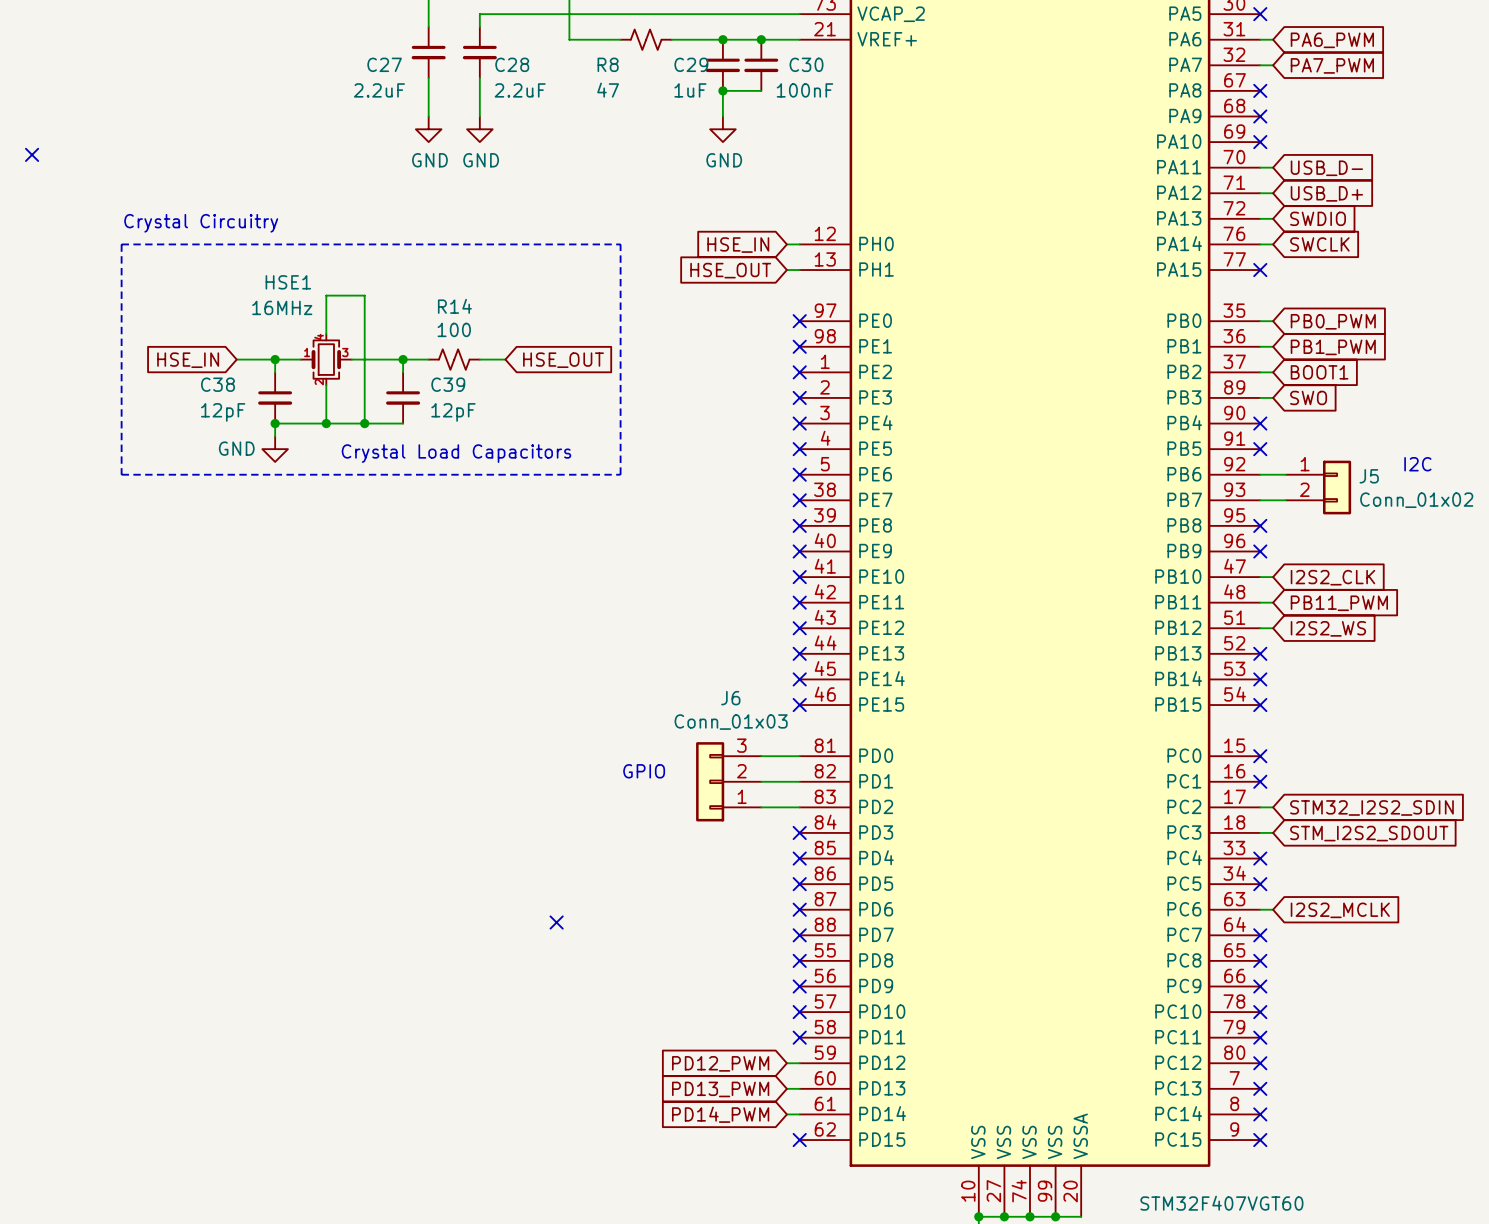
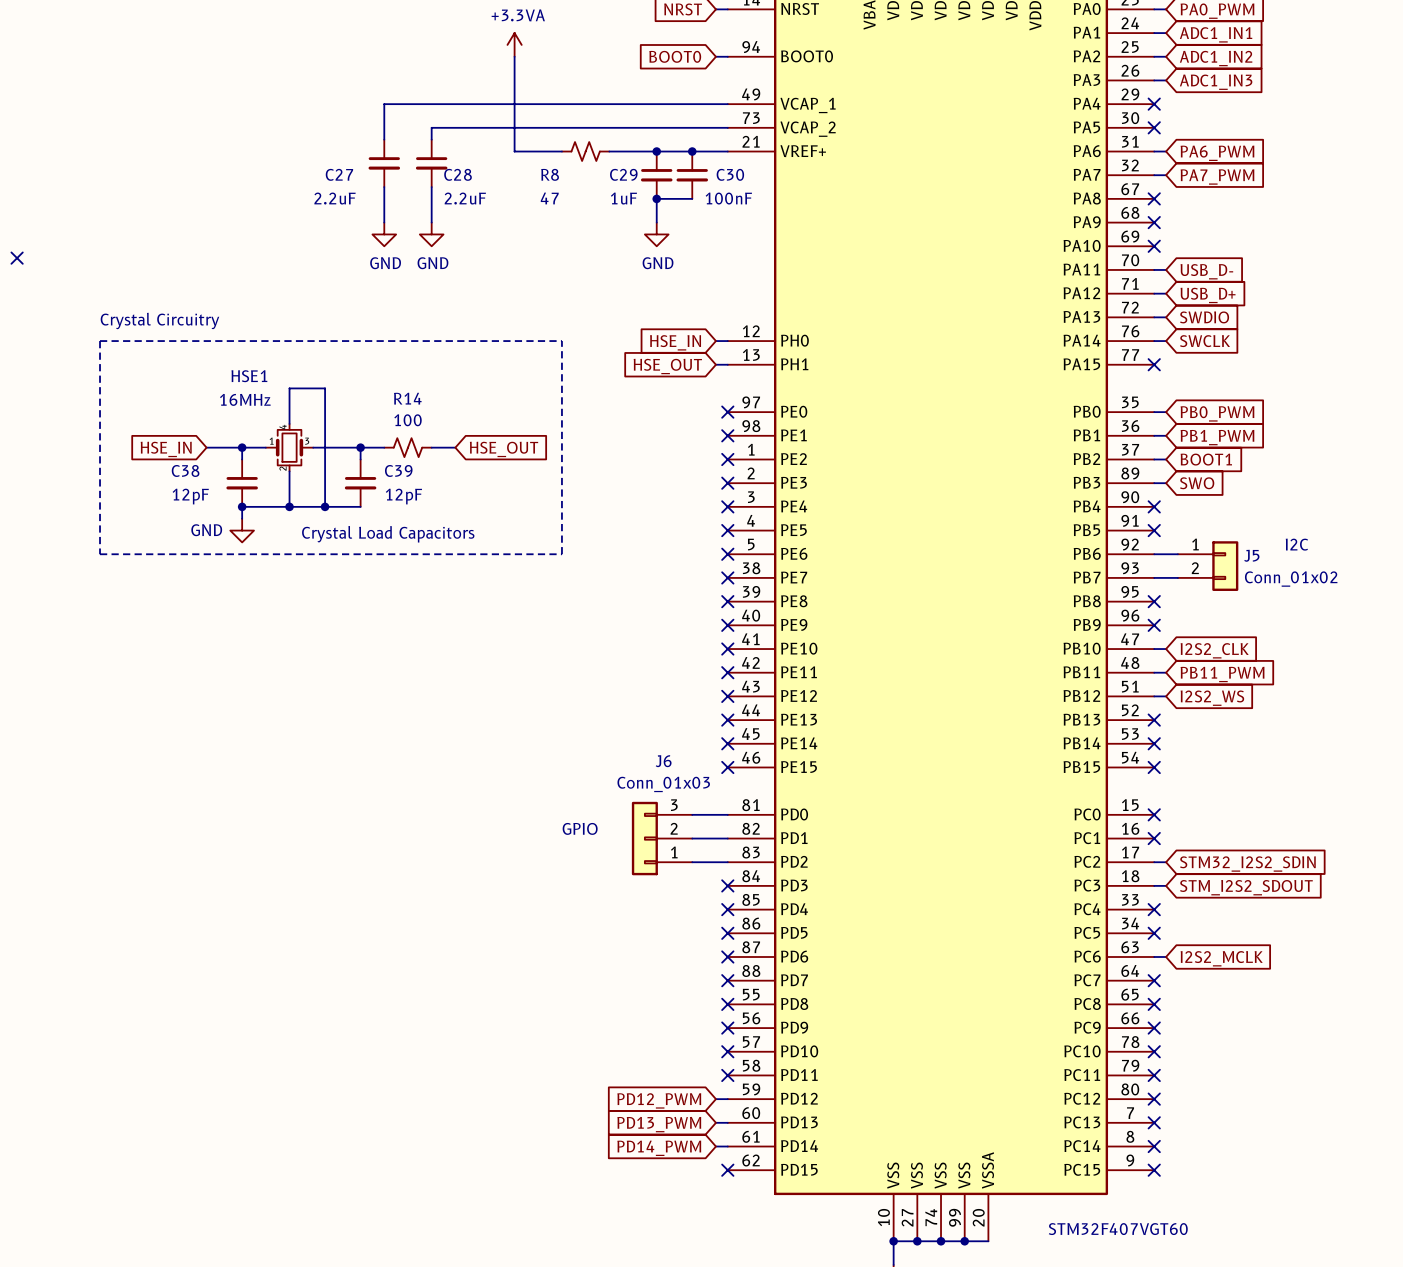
no-connect mark: (556, 922) -> none

